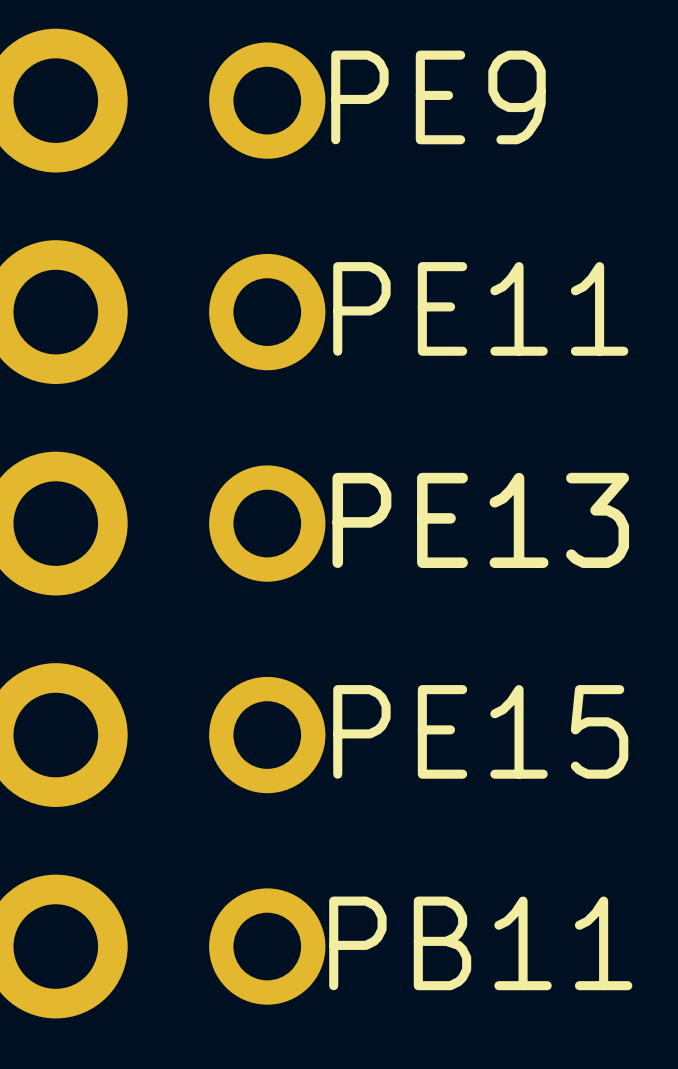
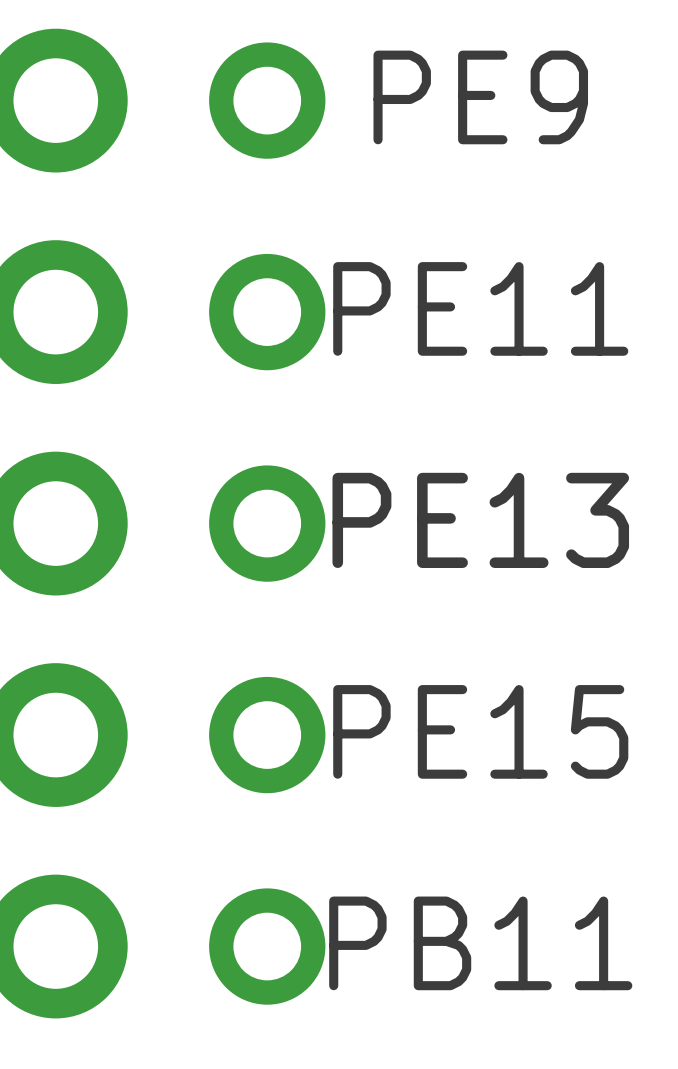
text position: PE9 (438, 97) -> PE9 (480, 97)

